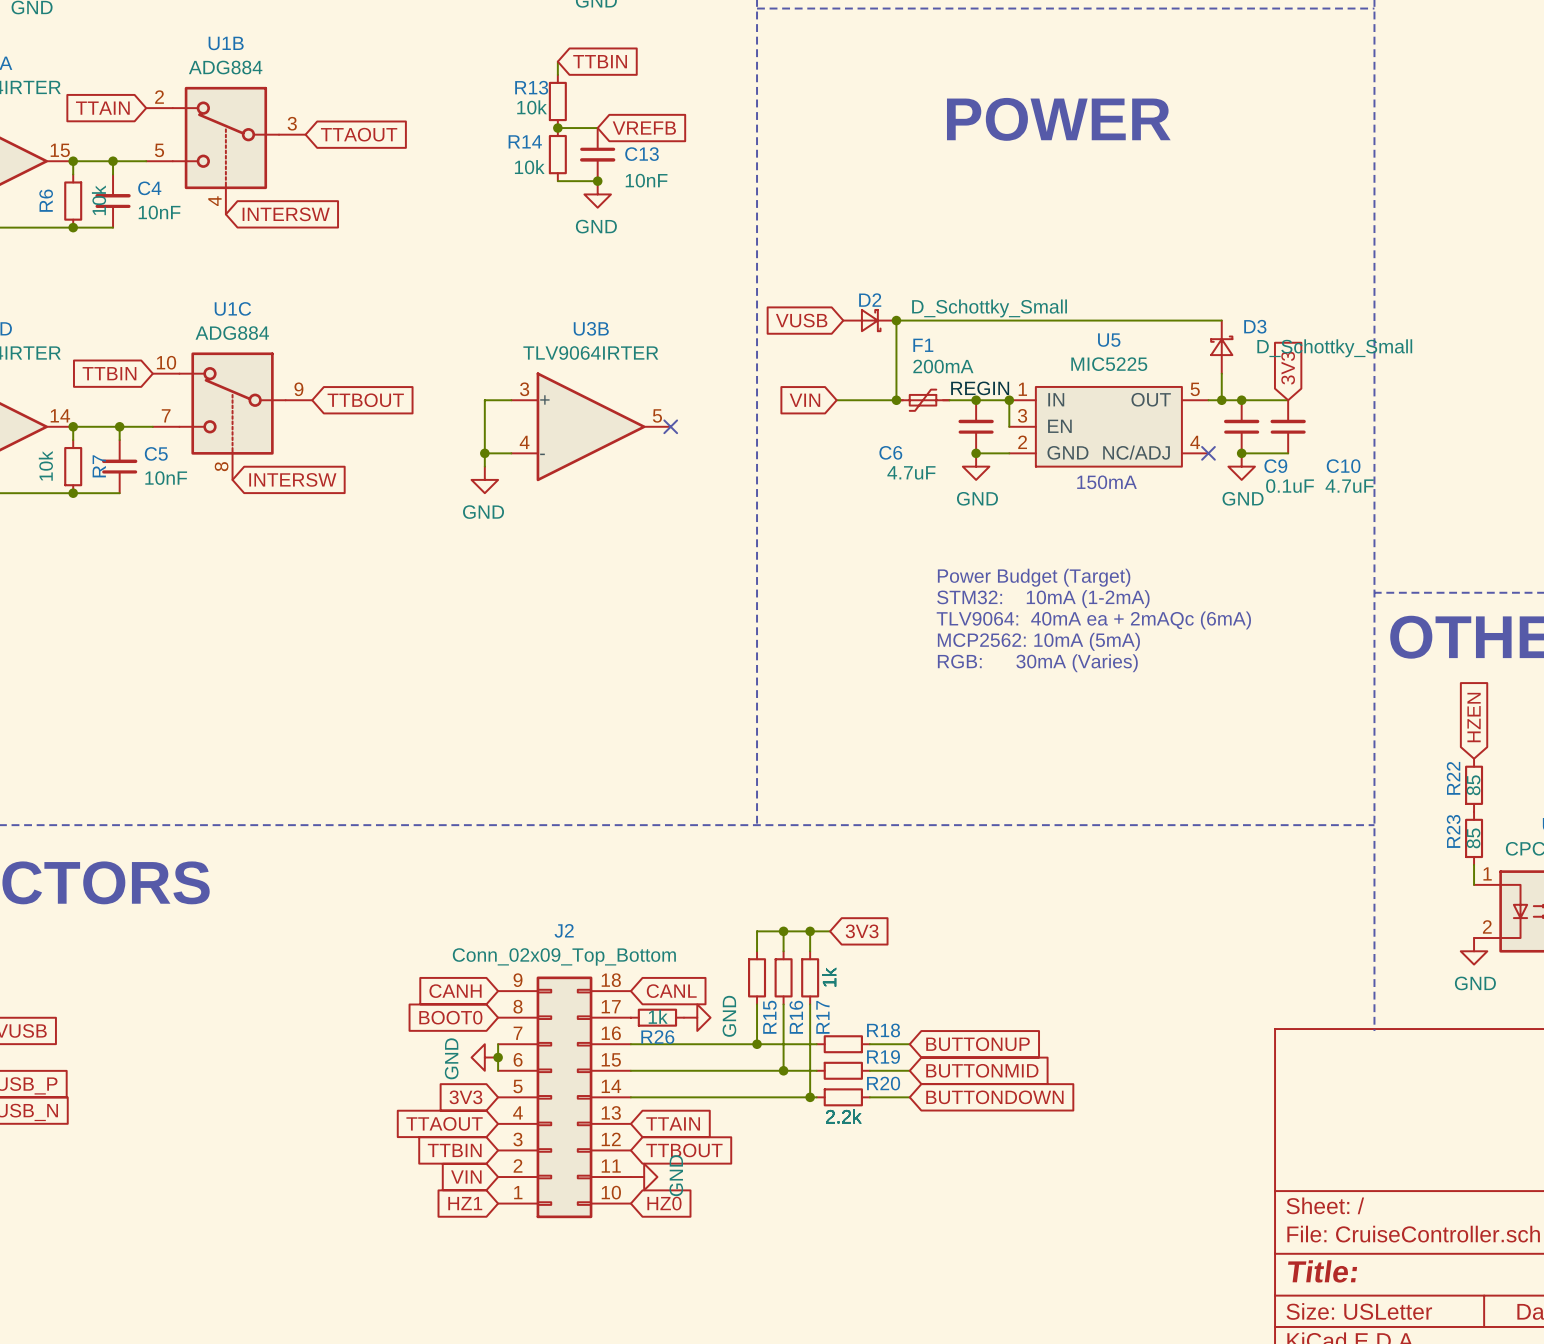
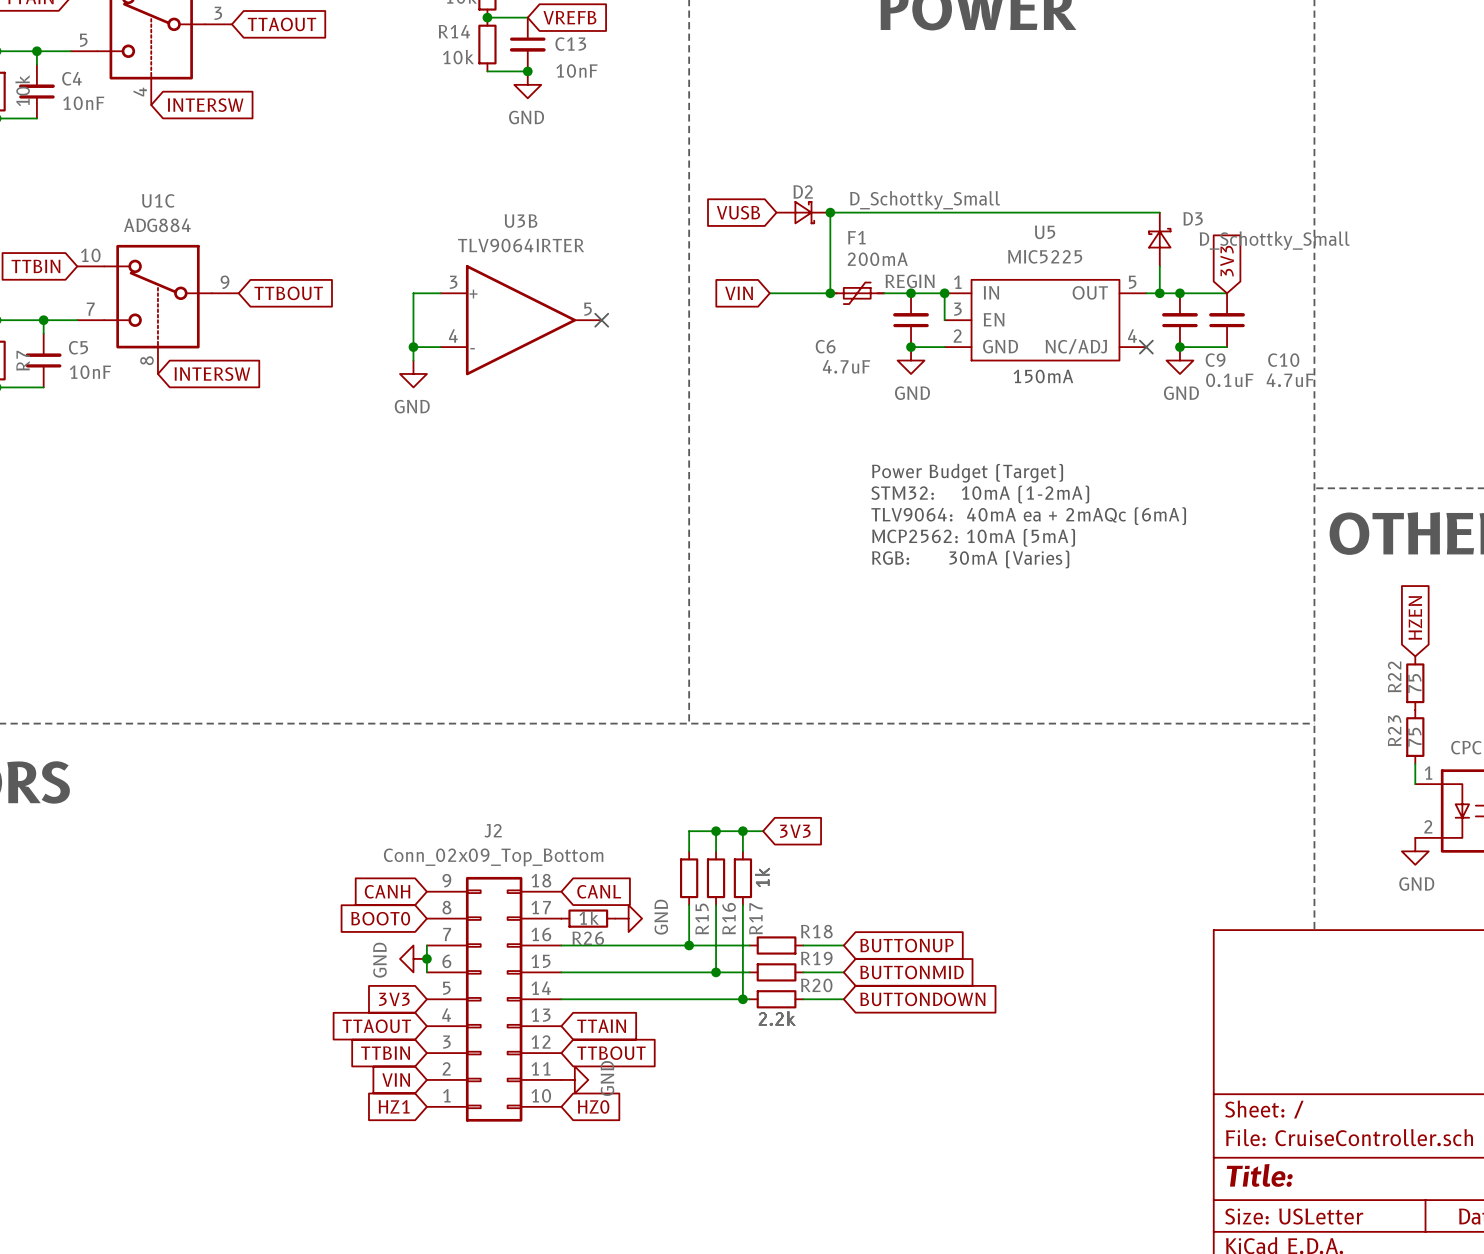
R22 value: 85 (1473, 785) -> 75 (1414, 683)
R23 value: 85 (1473, 838) -> 75 (1414, 737)

